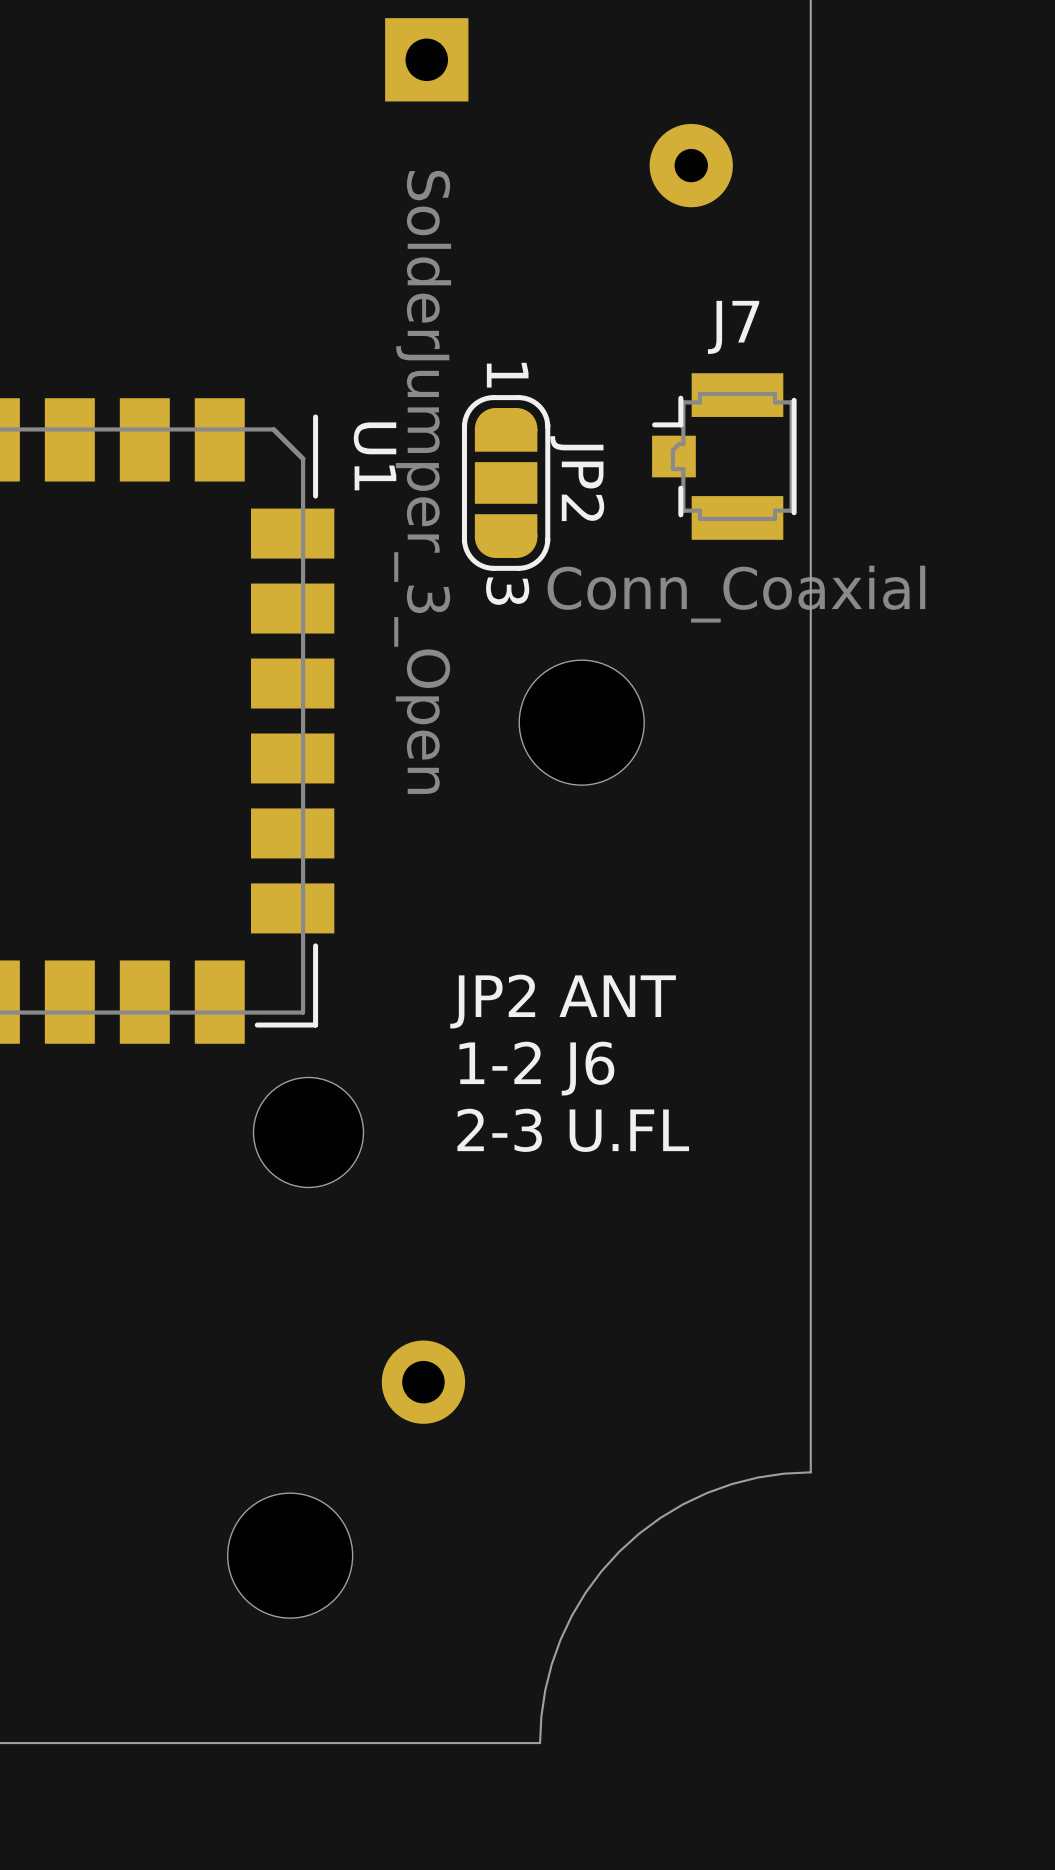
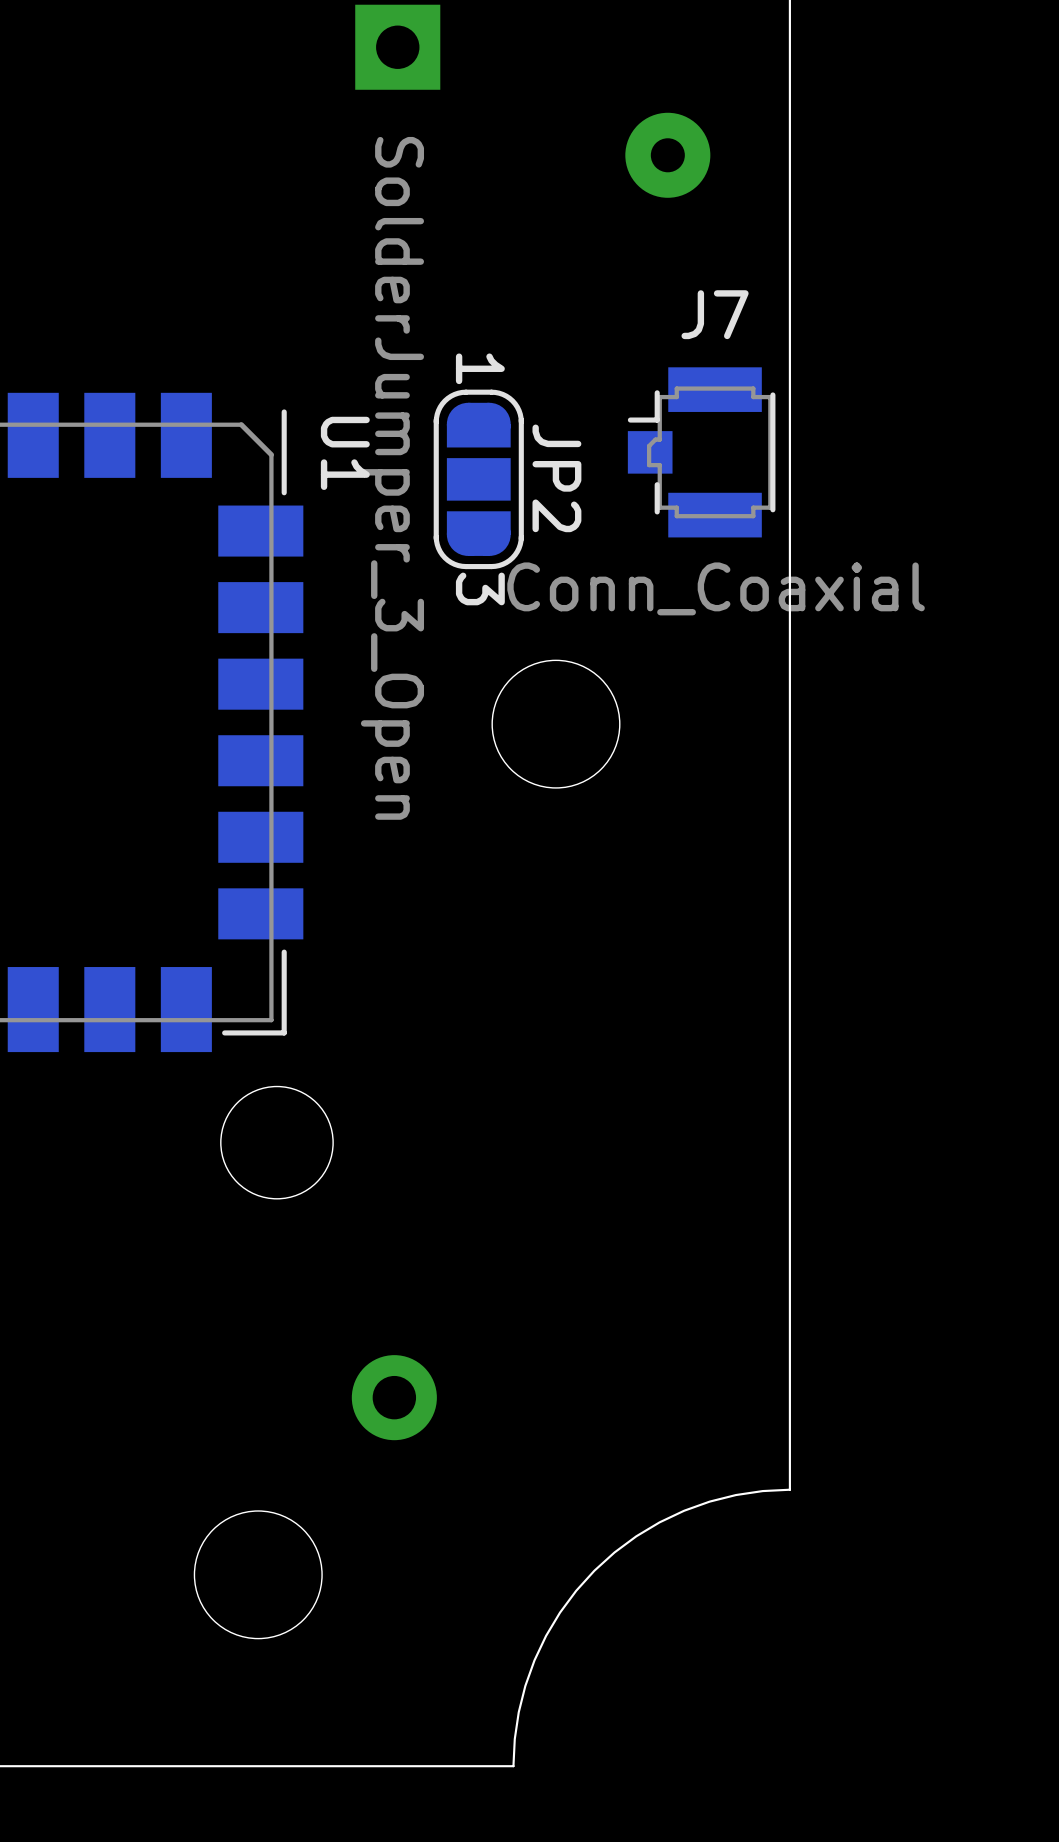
text: JP2 ANT (563, 1001) -> none
text: 1-2 J6 (536, 1068) -> none
text: 2-3 U.FL (573, 1130) -> none

